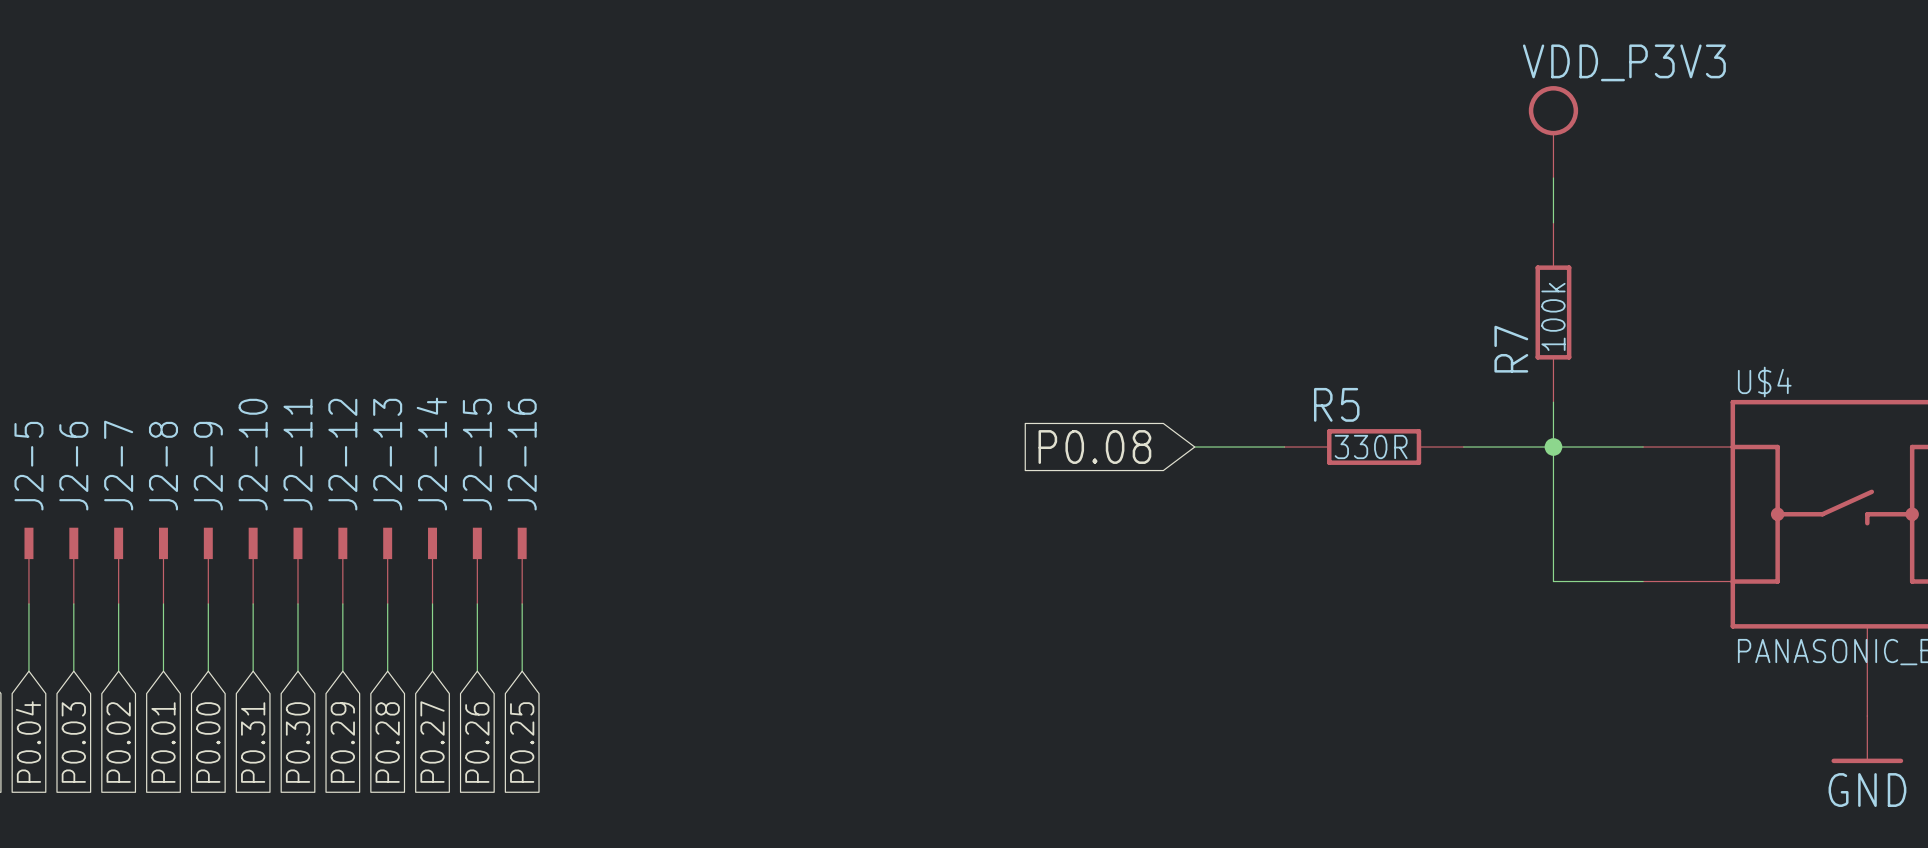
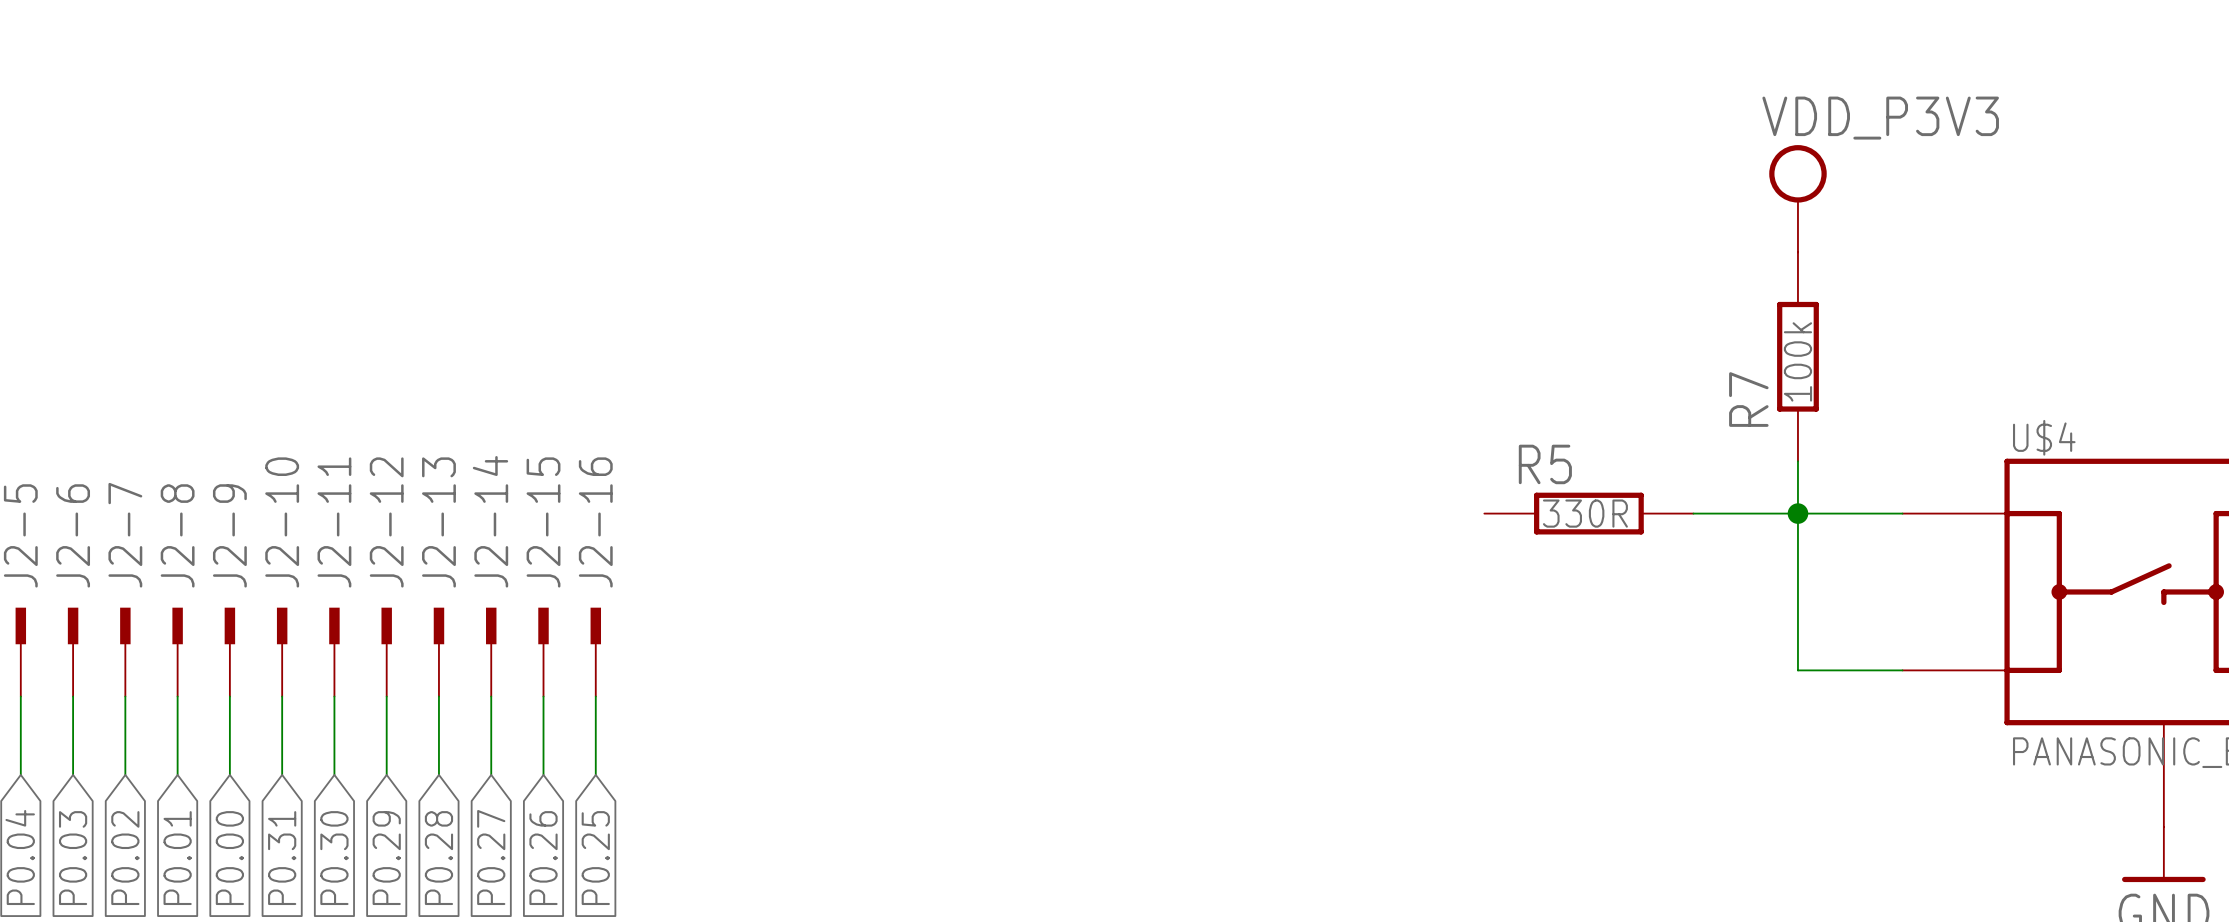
power symbol position: VDD_P3V3 (1553, 132) -> VDD_P3V3 (1797, 198)
global label: P0.08 (1094, 447) -> none
wire: (1194, 447) (1284, 447) -> none

